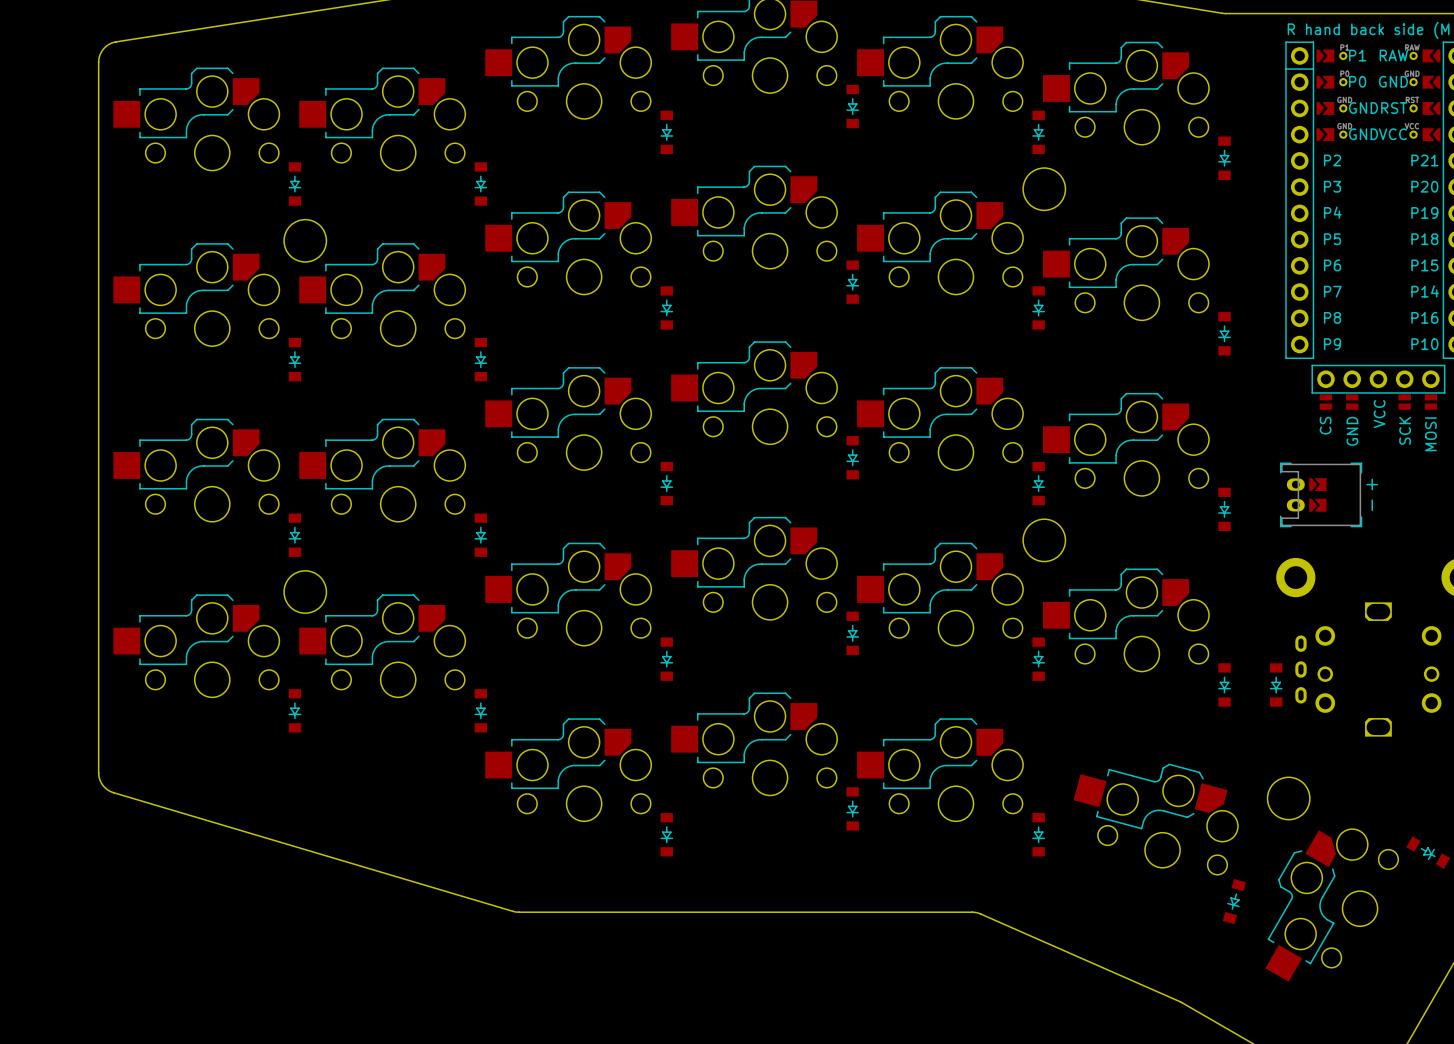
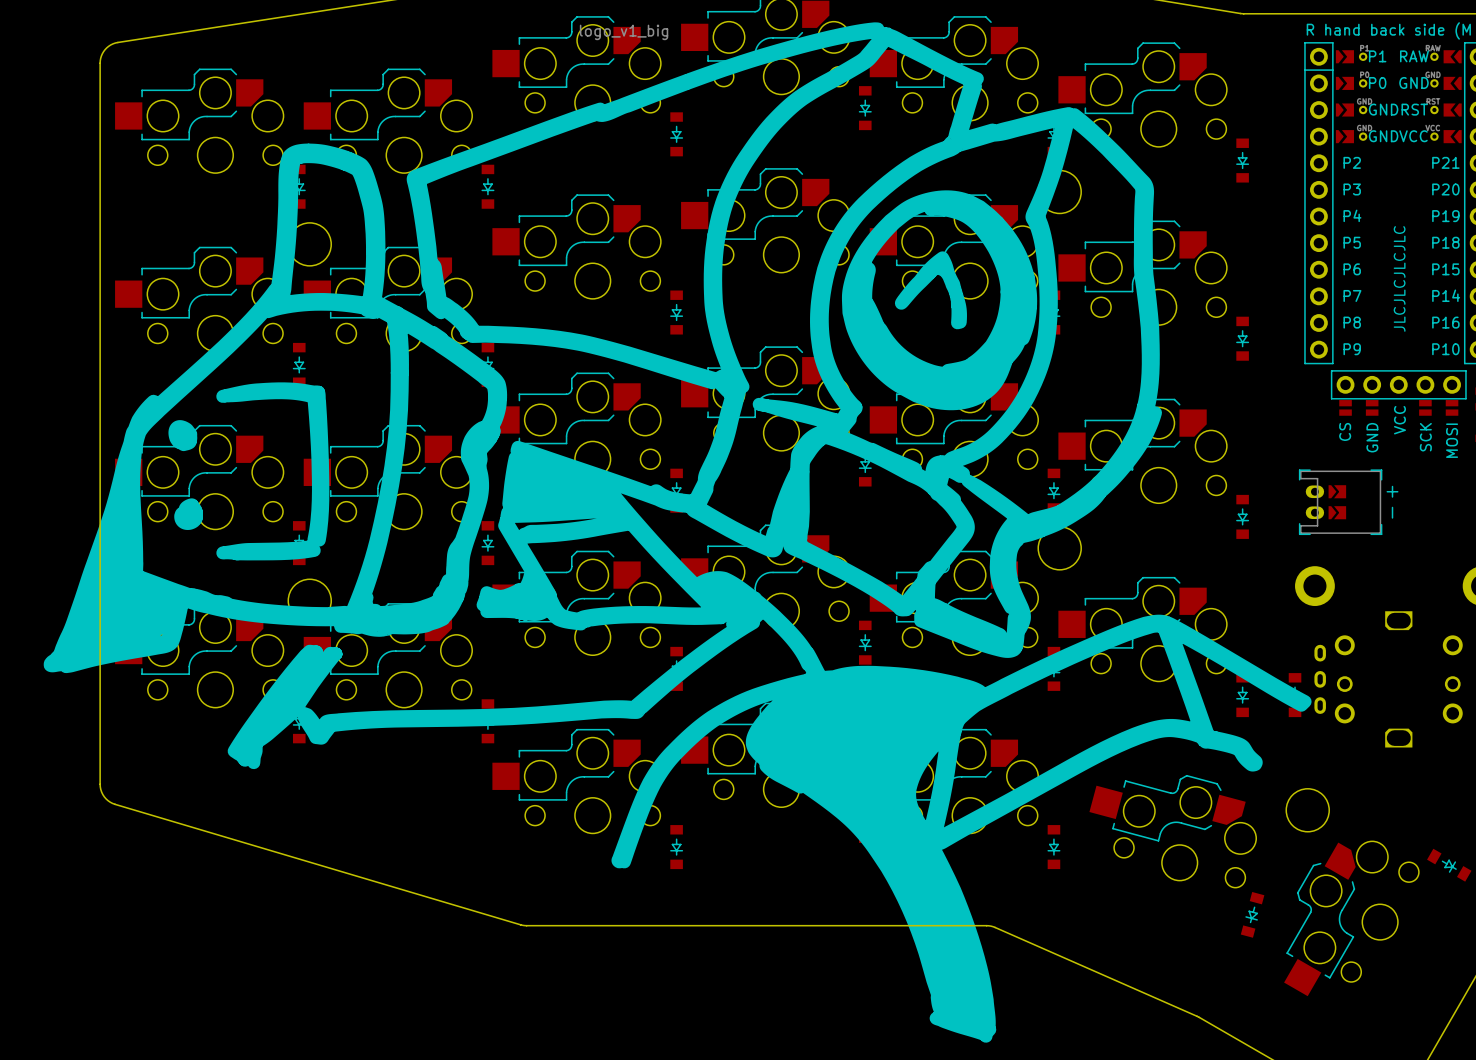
drawing: none -> [43, 22, 1312, 1043]
text: none -> JLCJLCJLCJLC (1399, 278)

